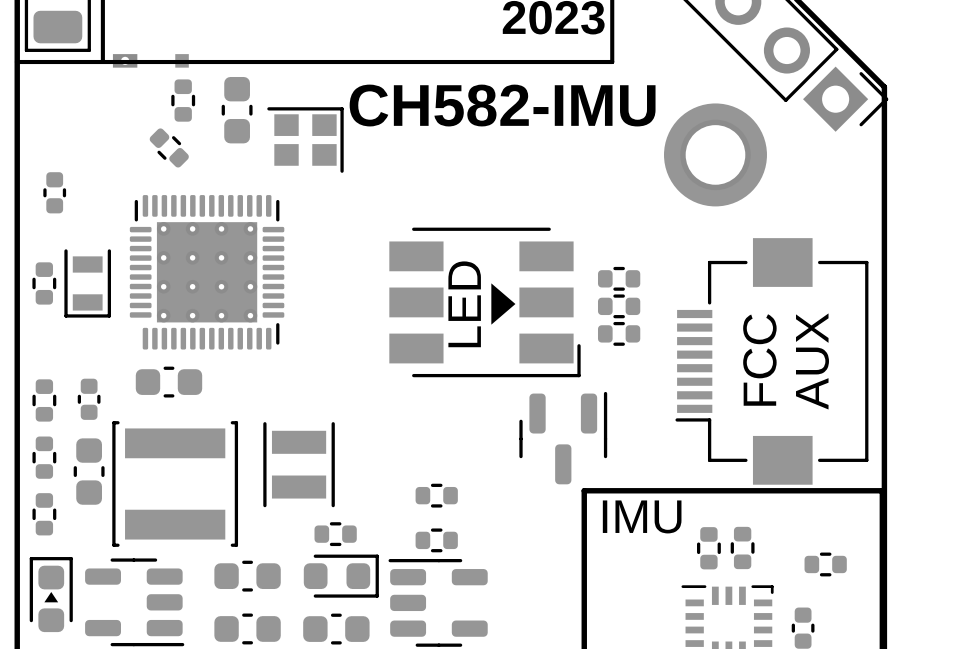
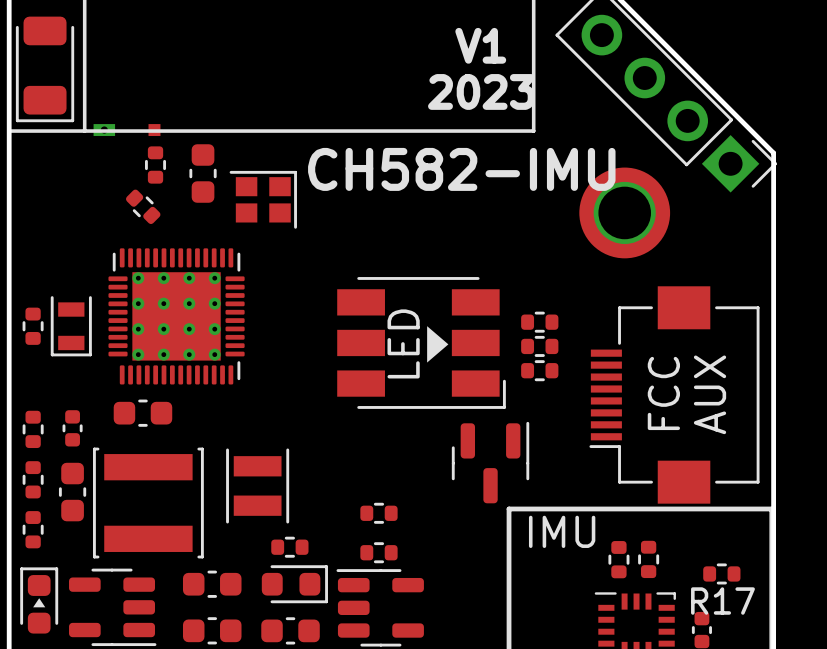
part: (54, 192) -> none
R17 name: none -> R17 (722, 601)

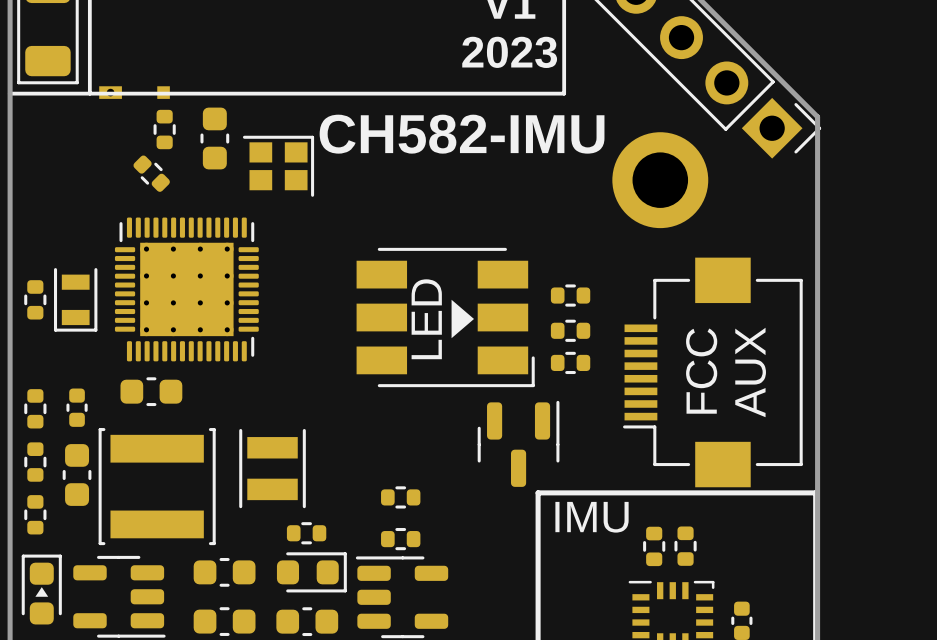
part: (539, 346) -> none
part: none -> (570, 330)
part: (539, 370) -> none
part: none -> (570, 362)
R17: (721, 573) -> none

